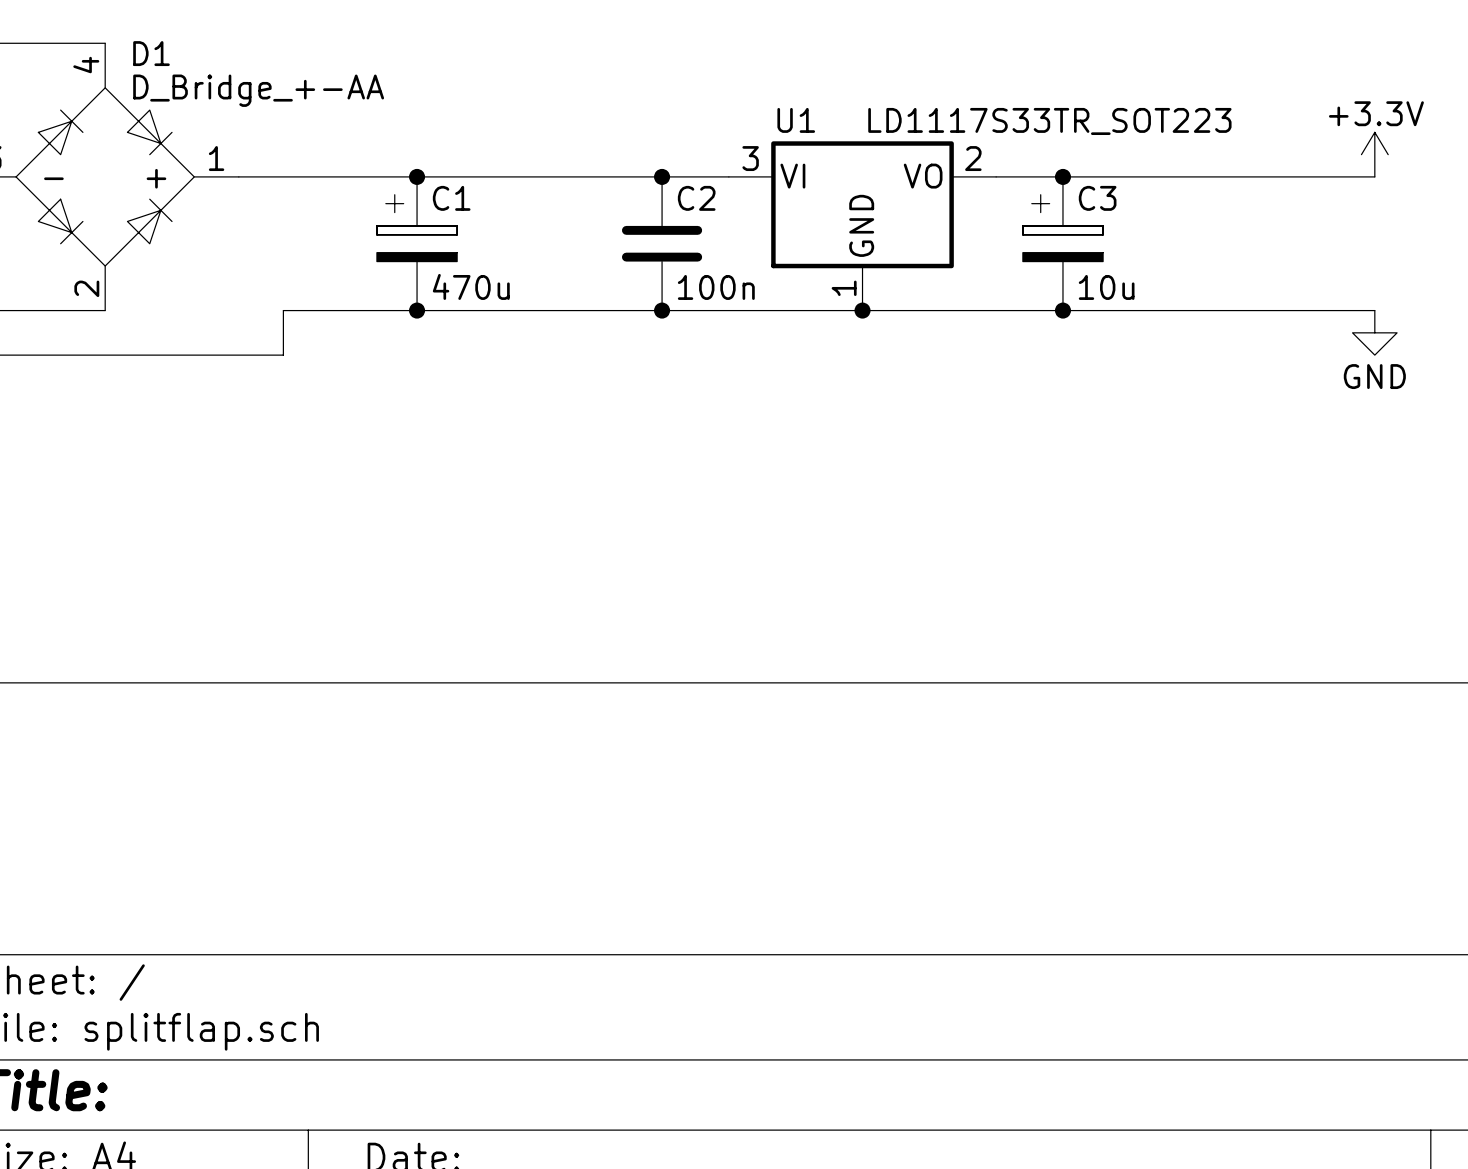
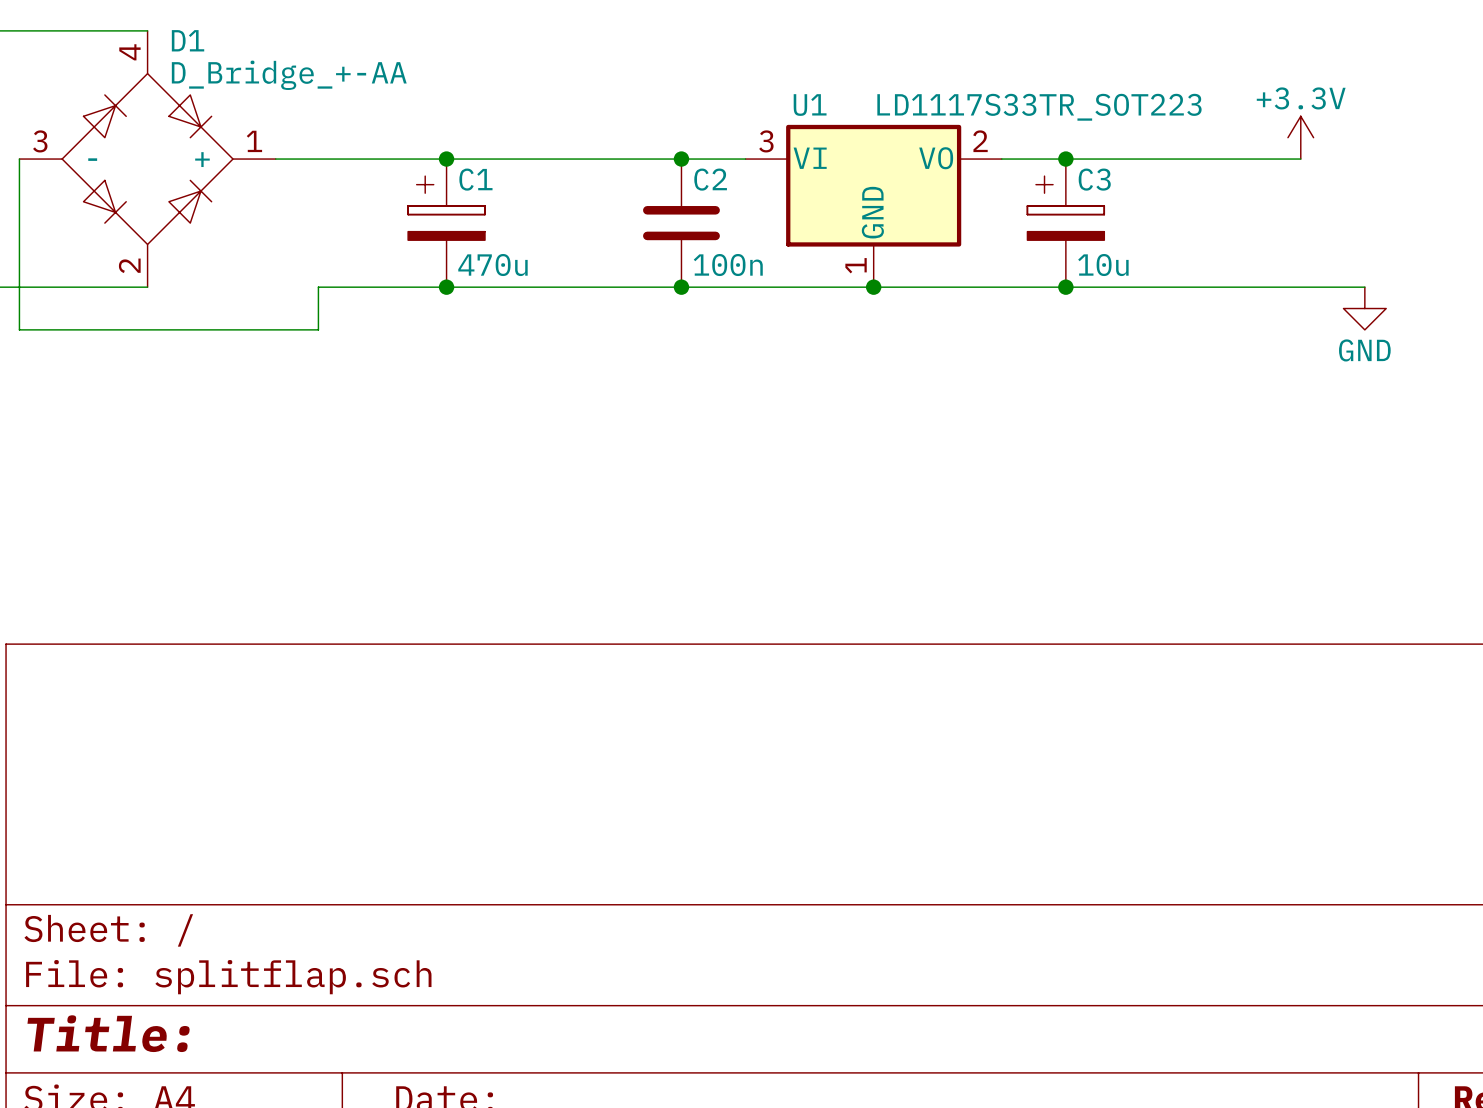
power symbol position: +3.3V (1374, 154) -> +3.3V (1300, 137)
wire: (1308, 176) (1374, 176) -> none

